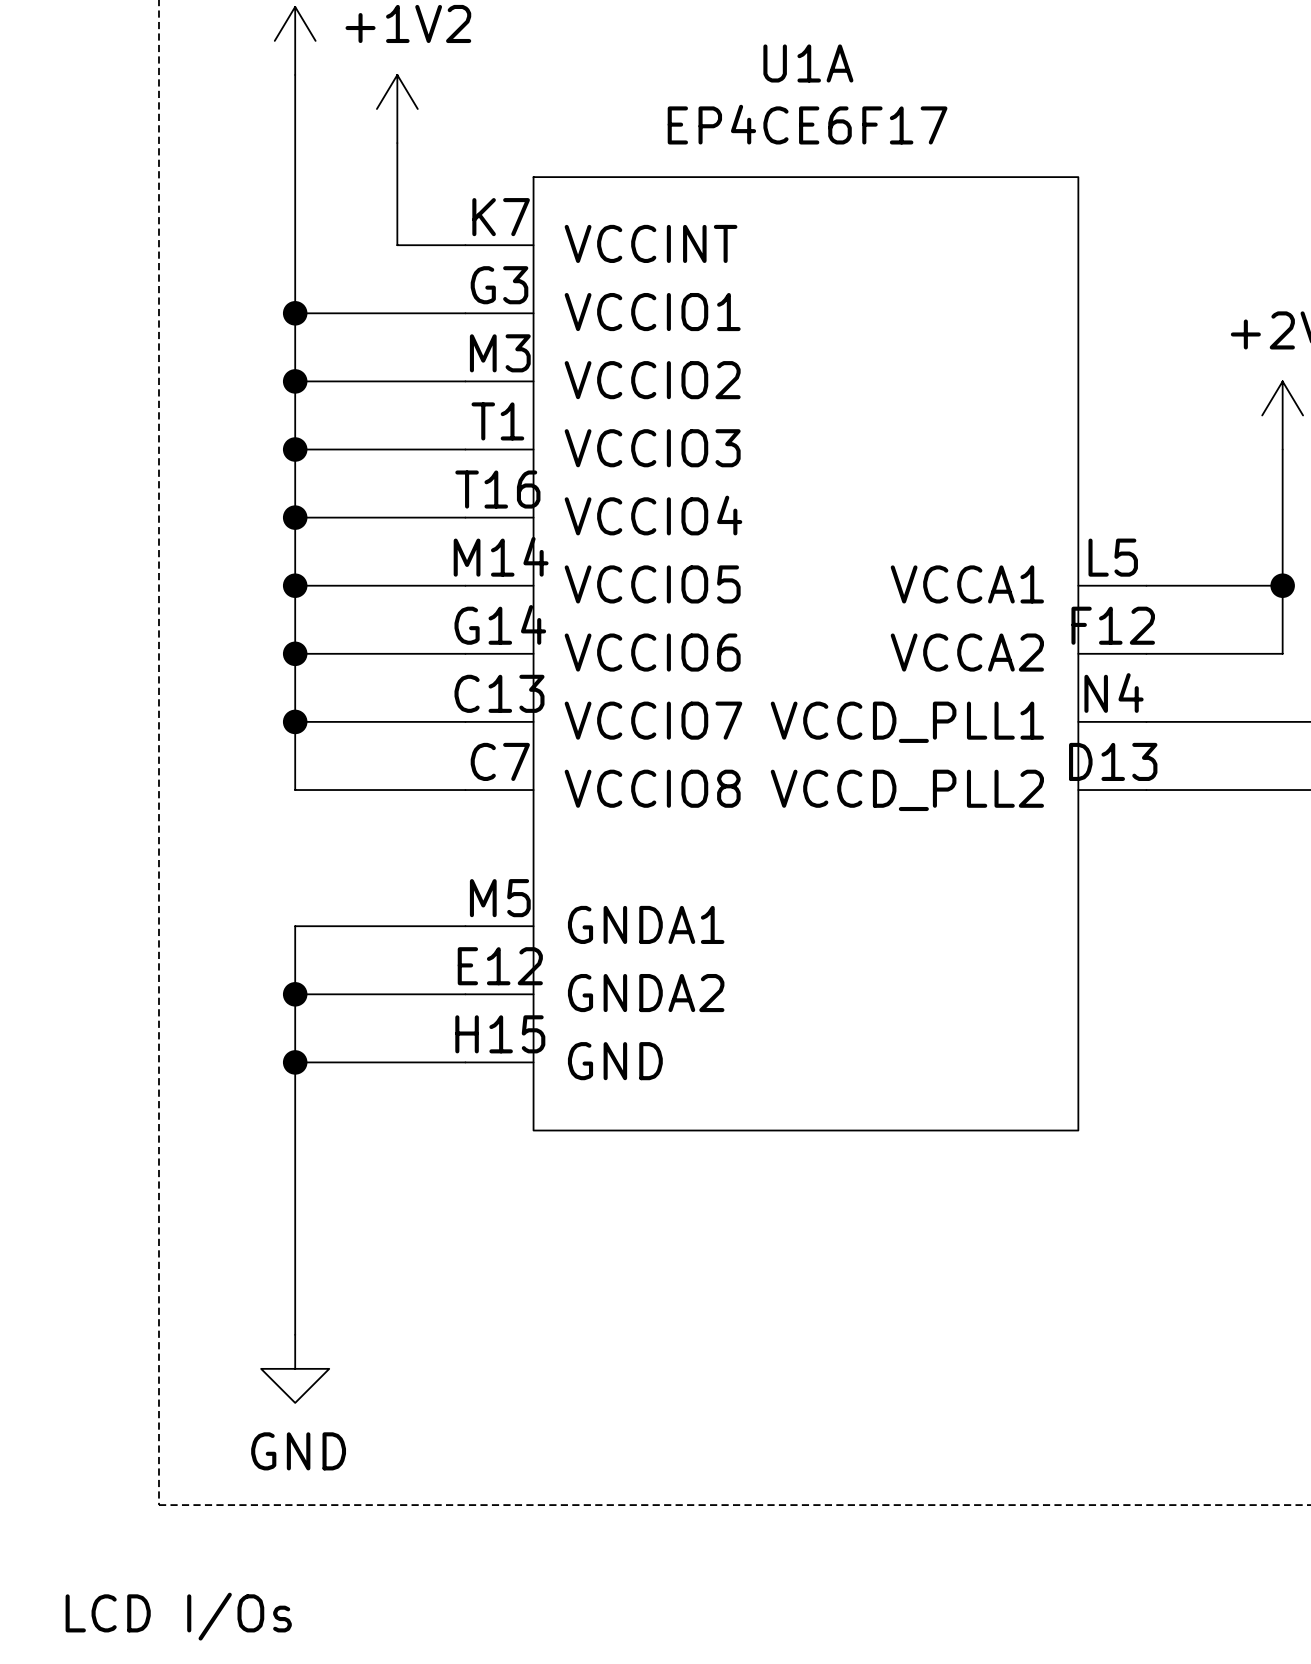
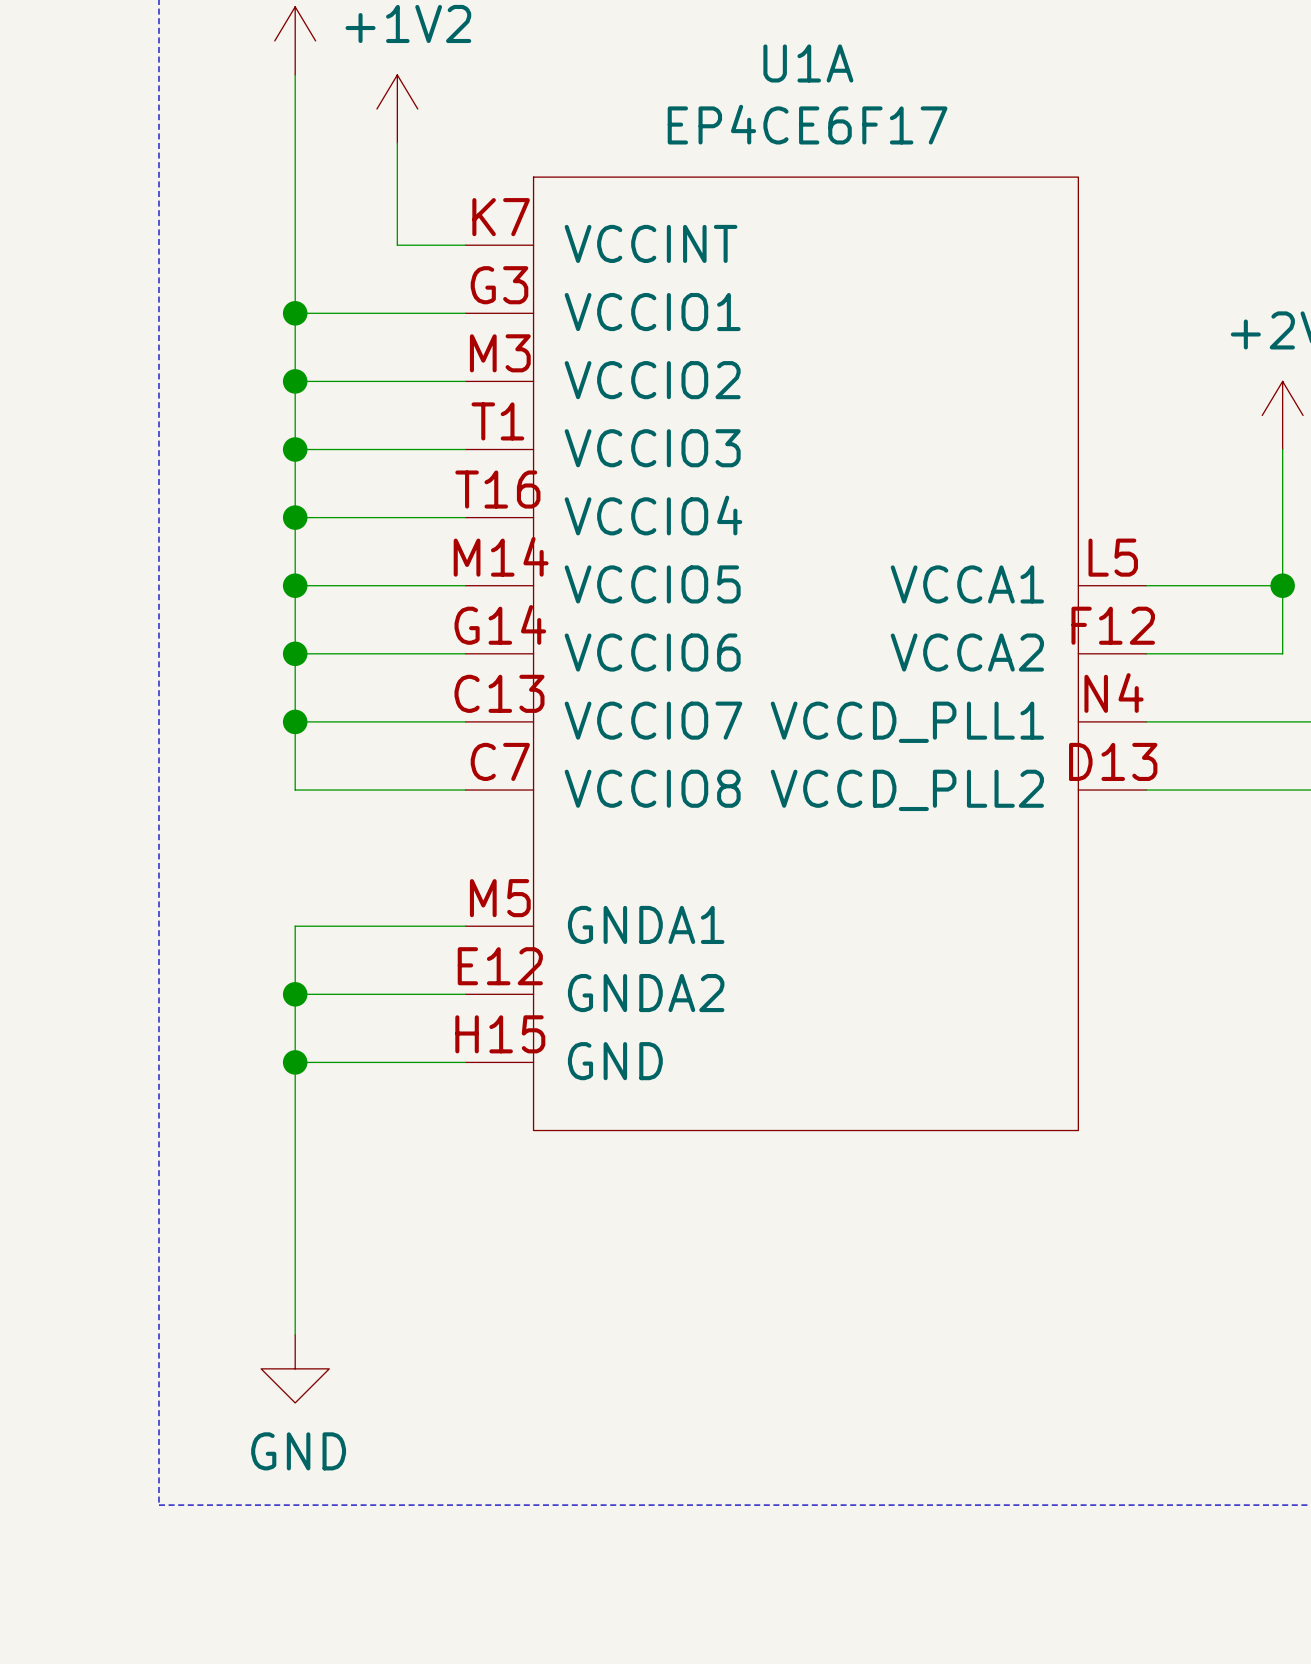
text: LCD I/Os (178, 1616) -> none

